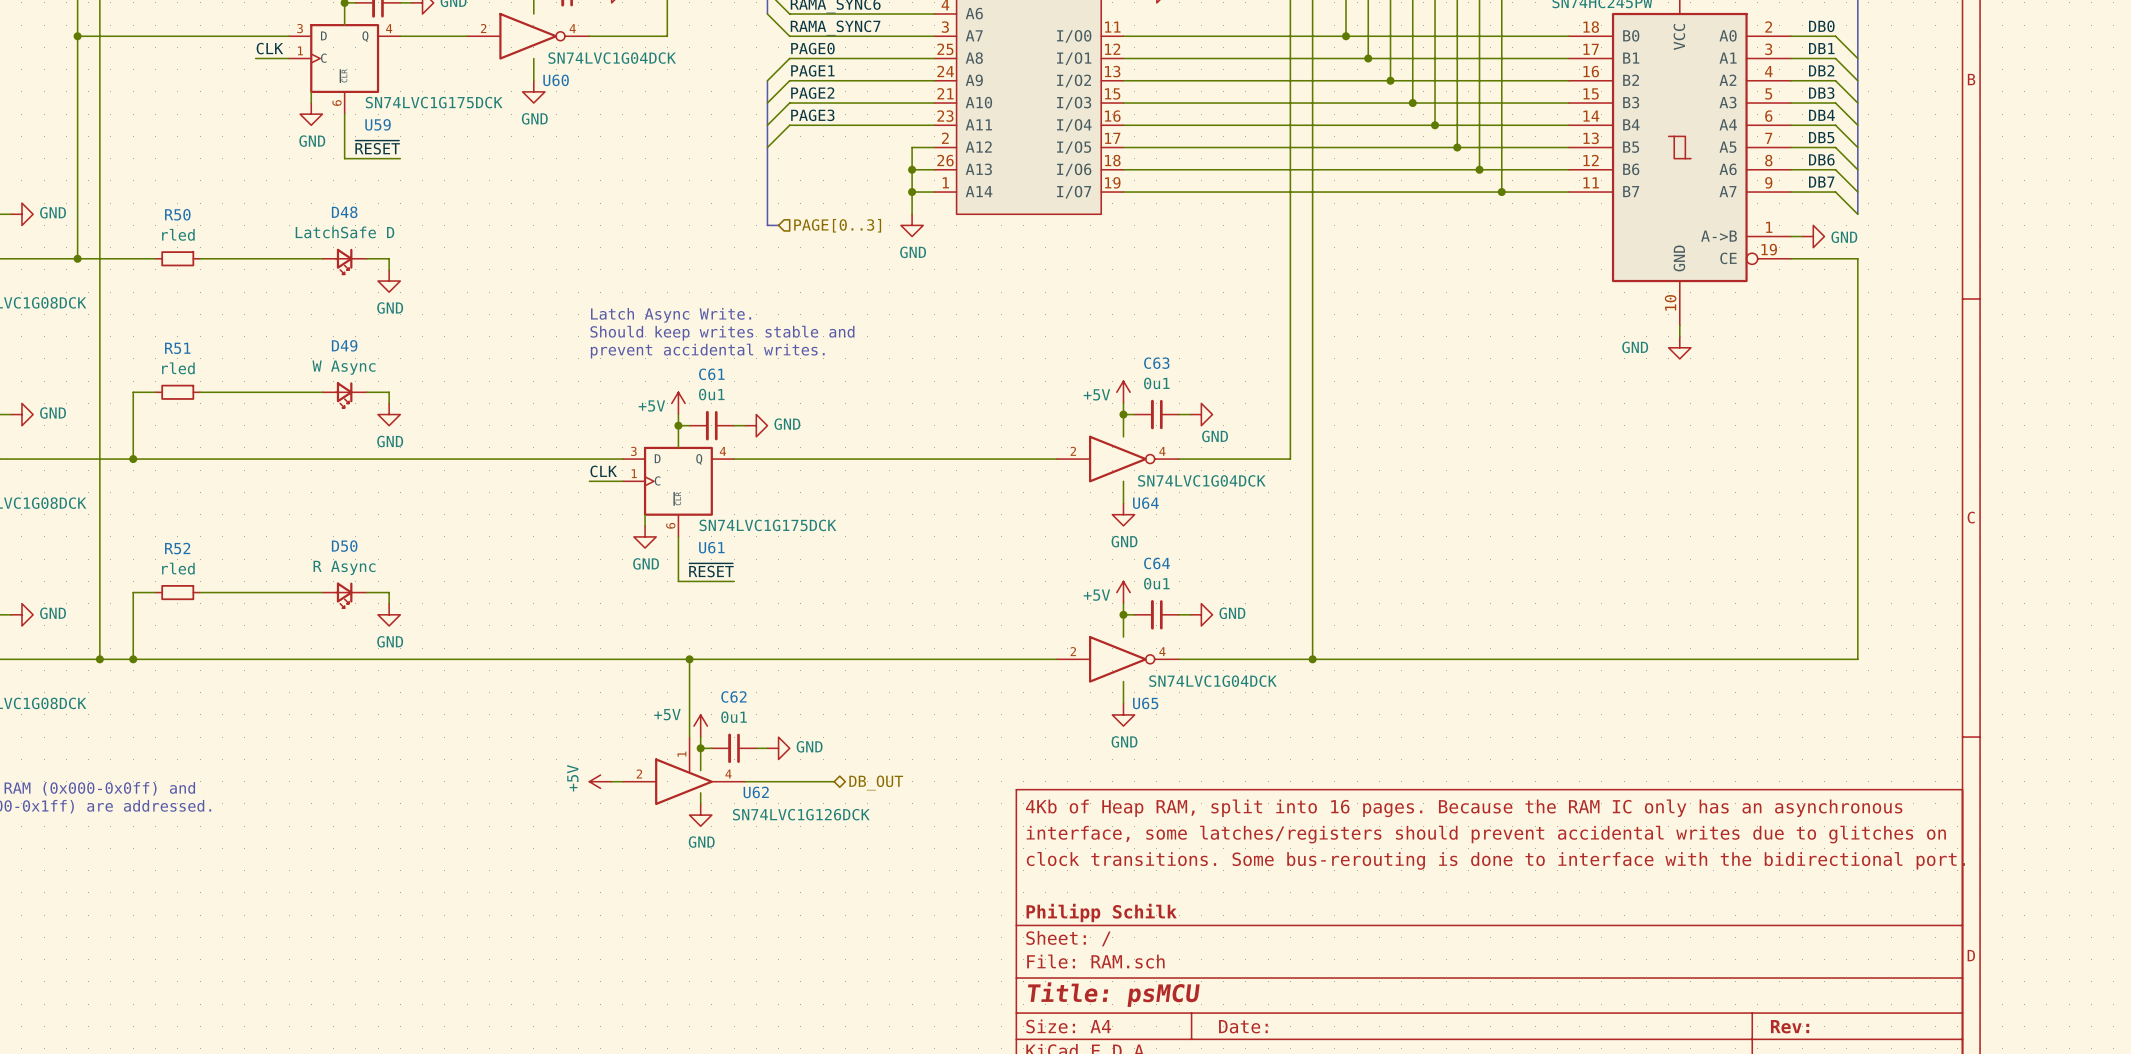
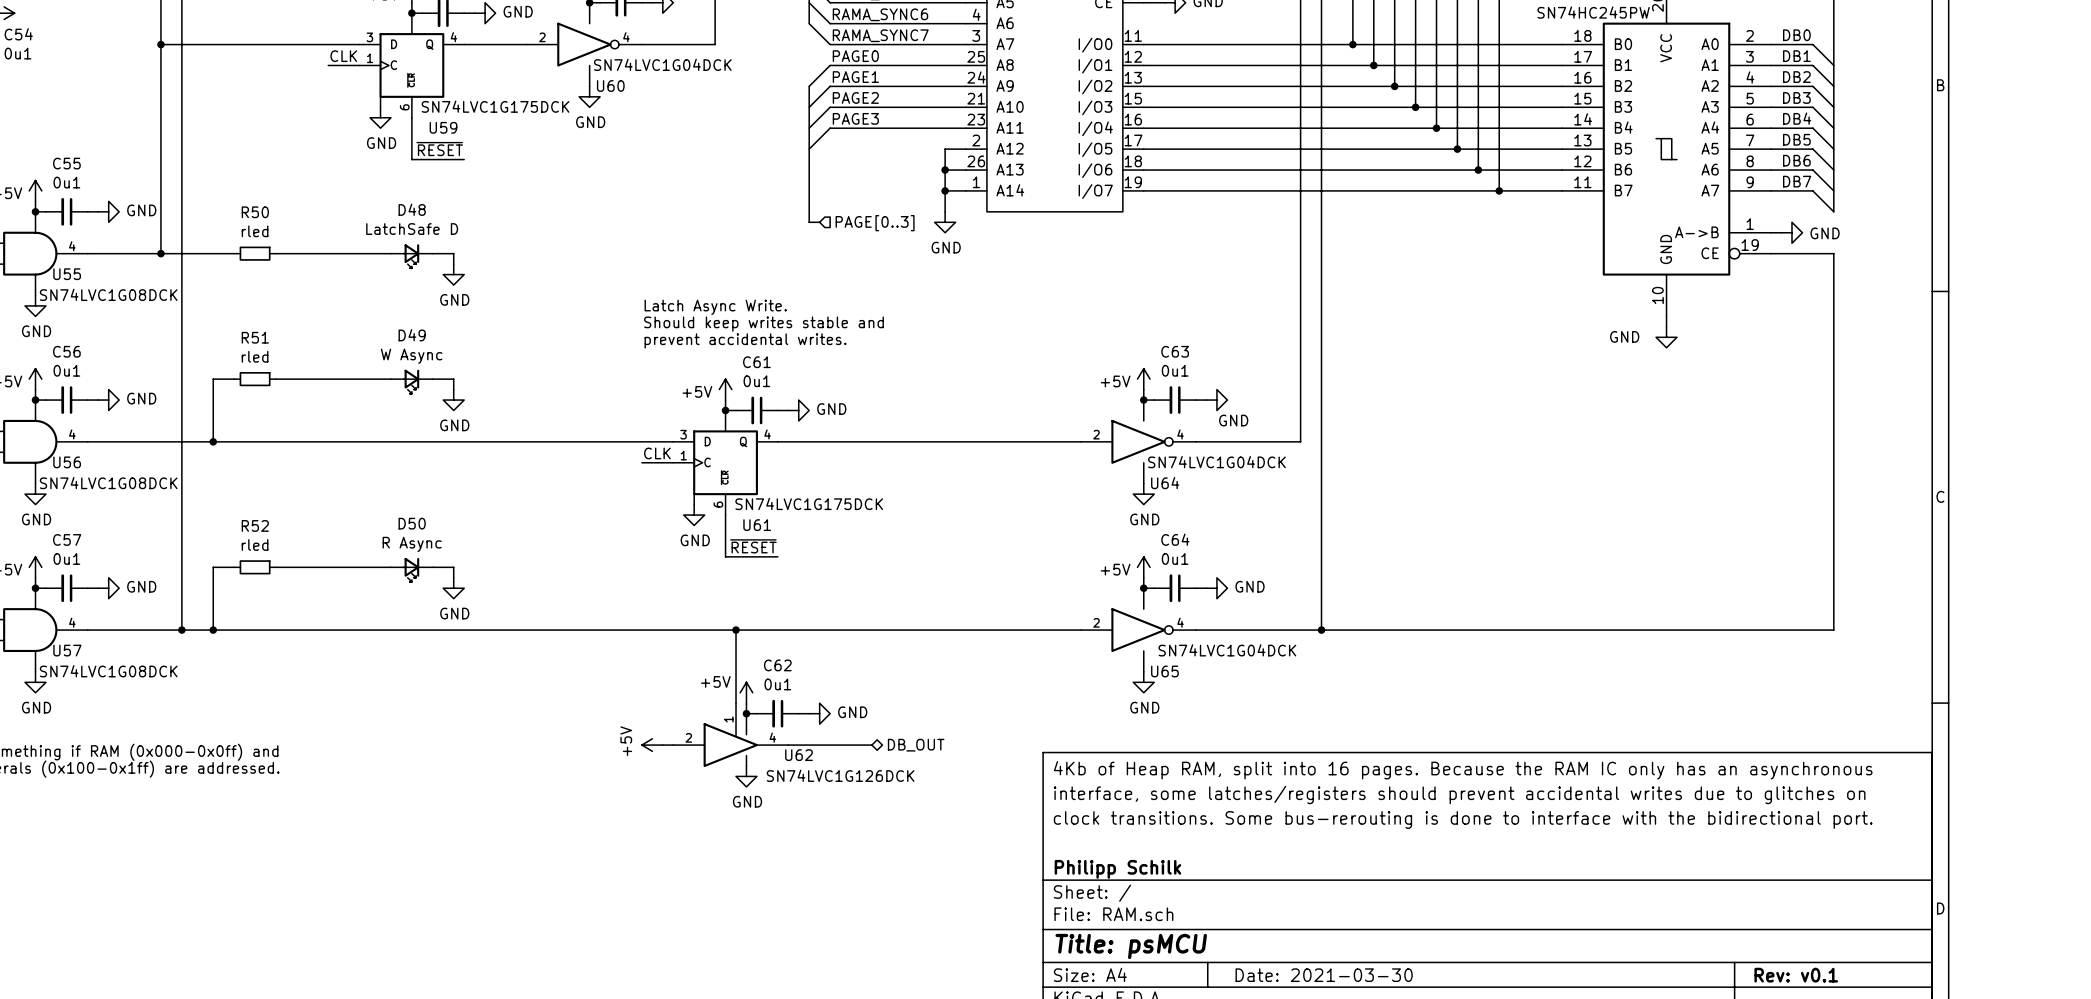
title block: Date: (1243, 1026) -> Date: 2021-03-30 (1324, 975)
title block: Rev: (1790, 1026) -> Rev: v0.1 (1796, 975)

